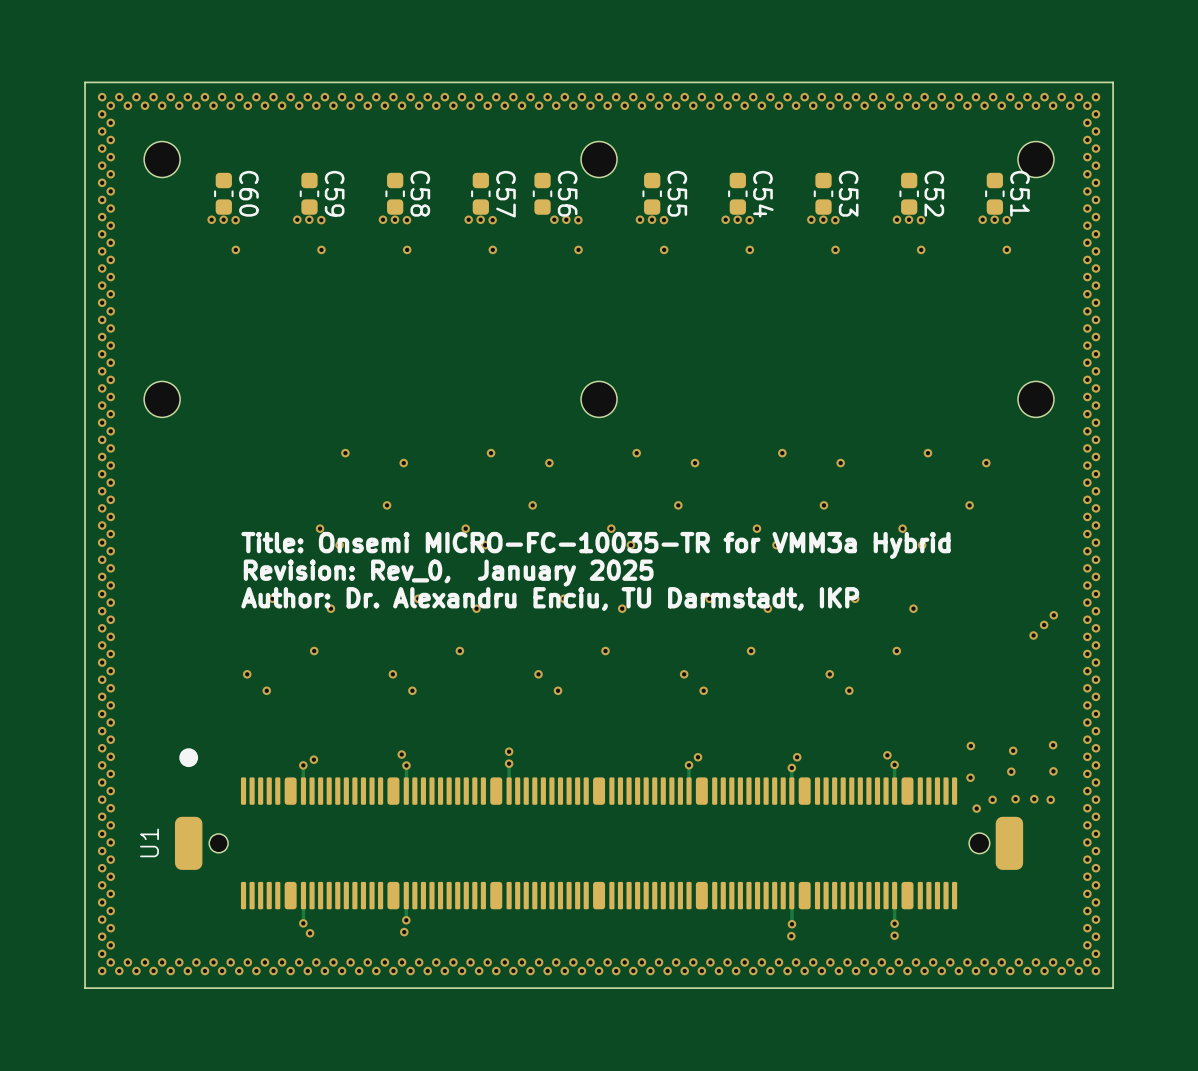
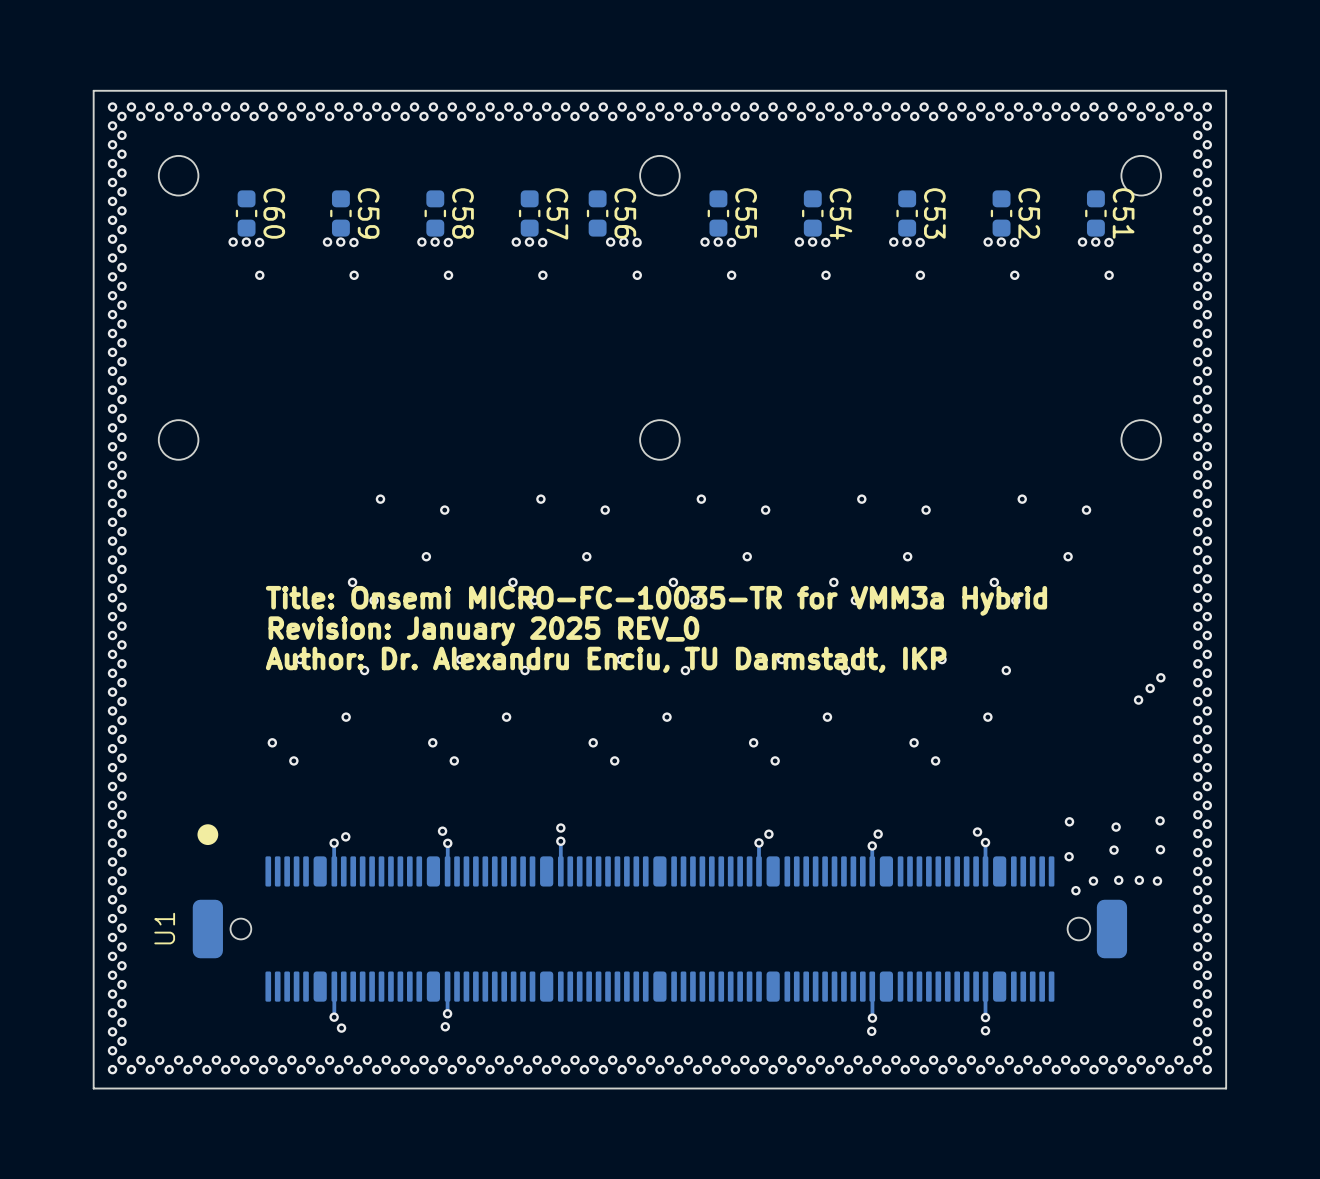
text: Revision: Rev_0, January 2025 (448, 573) -> Revision: January 2025 REV_0 (483, 631)

